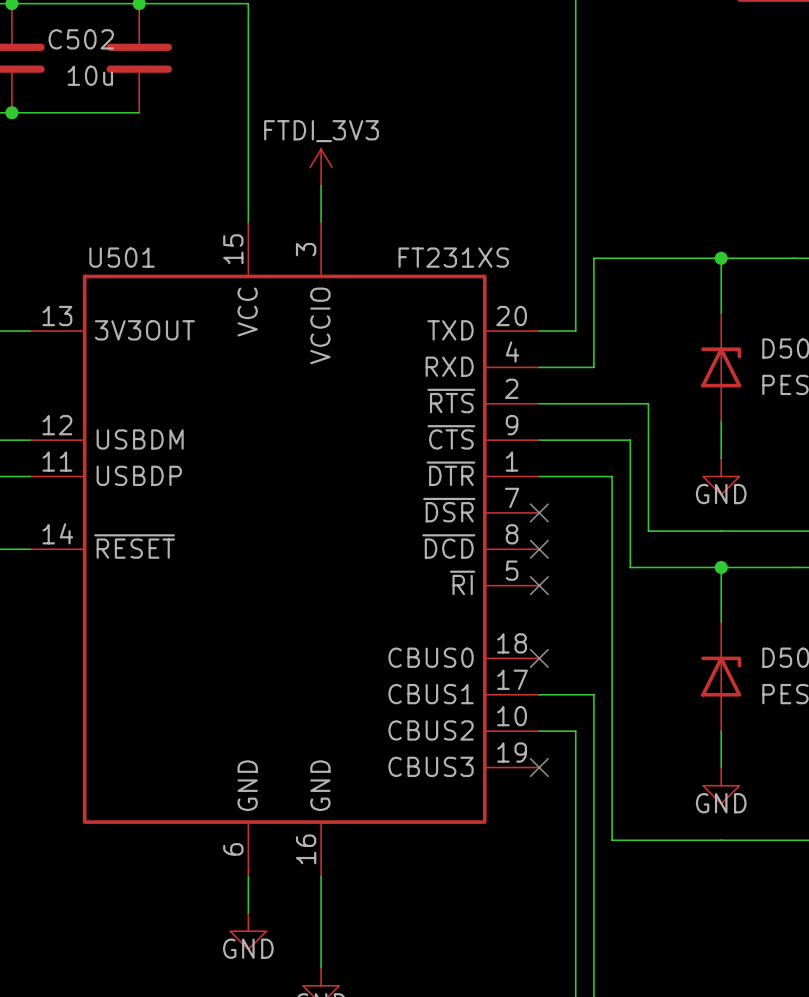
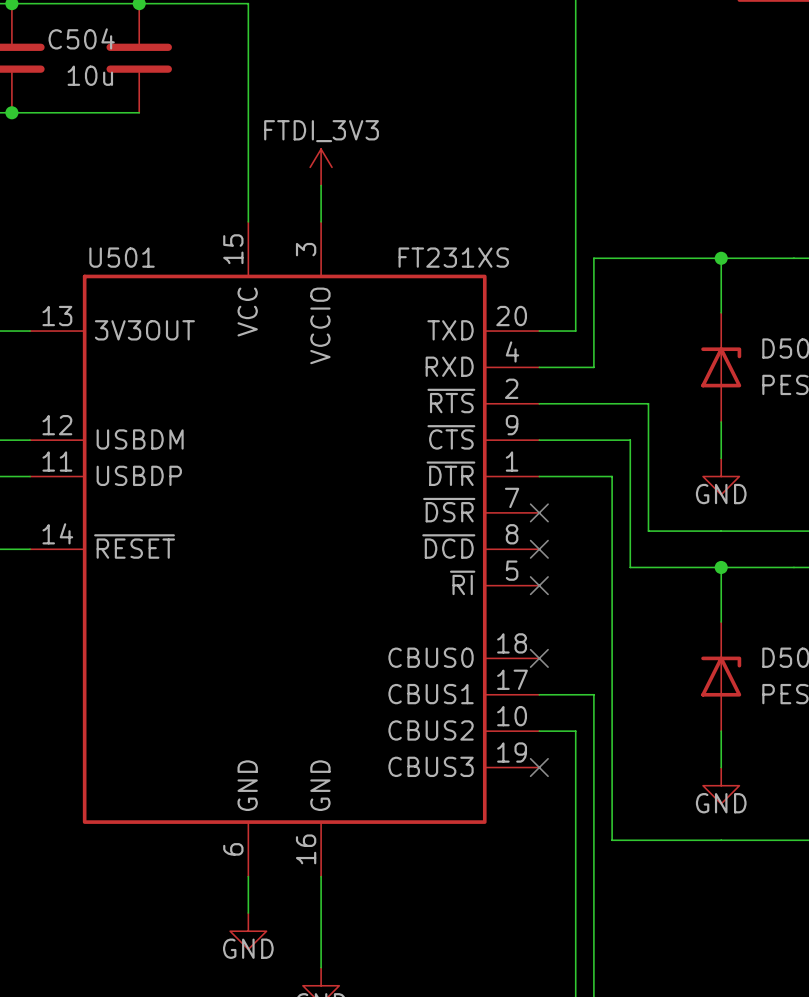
C502 name: C502 (81, 39) -> C504 (81, 38)

